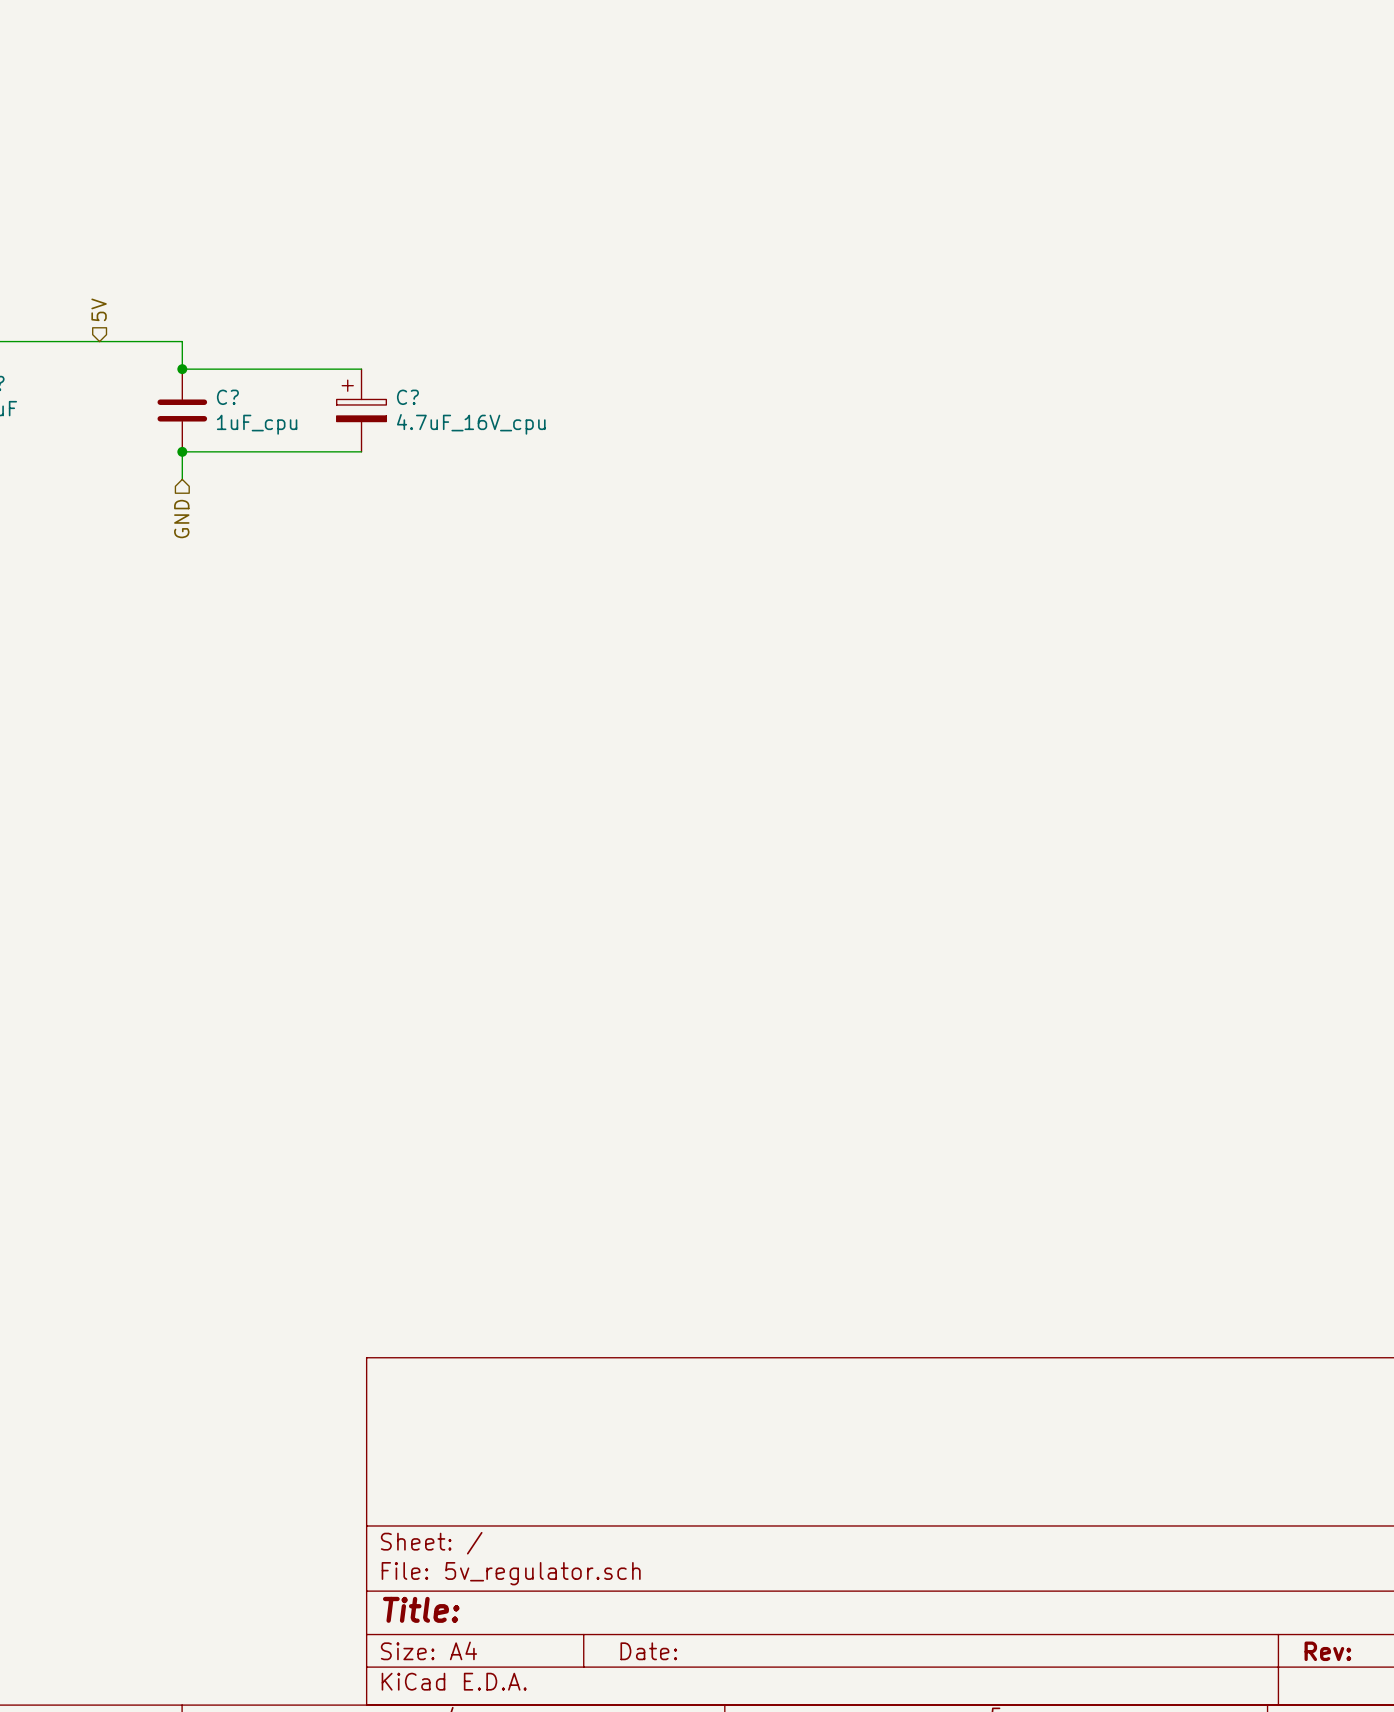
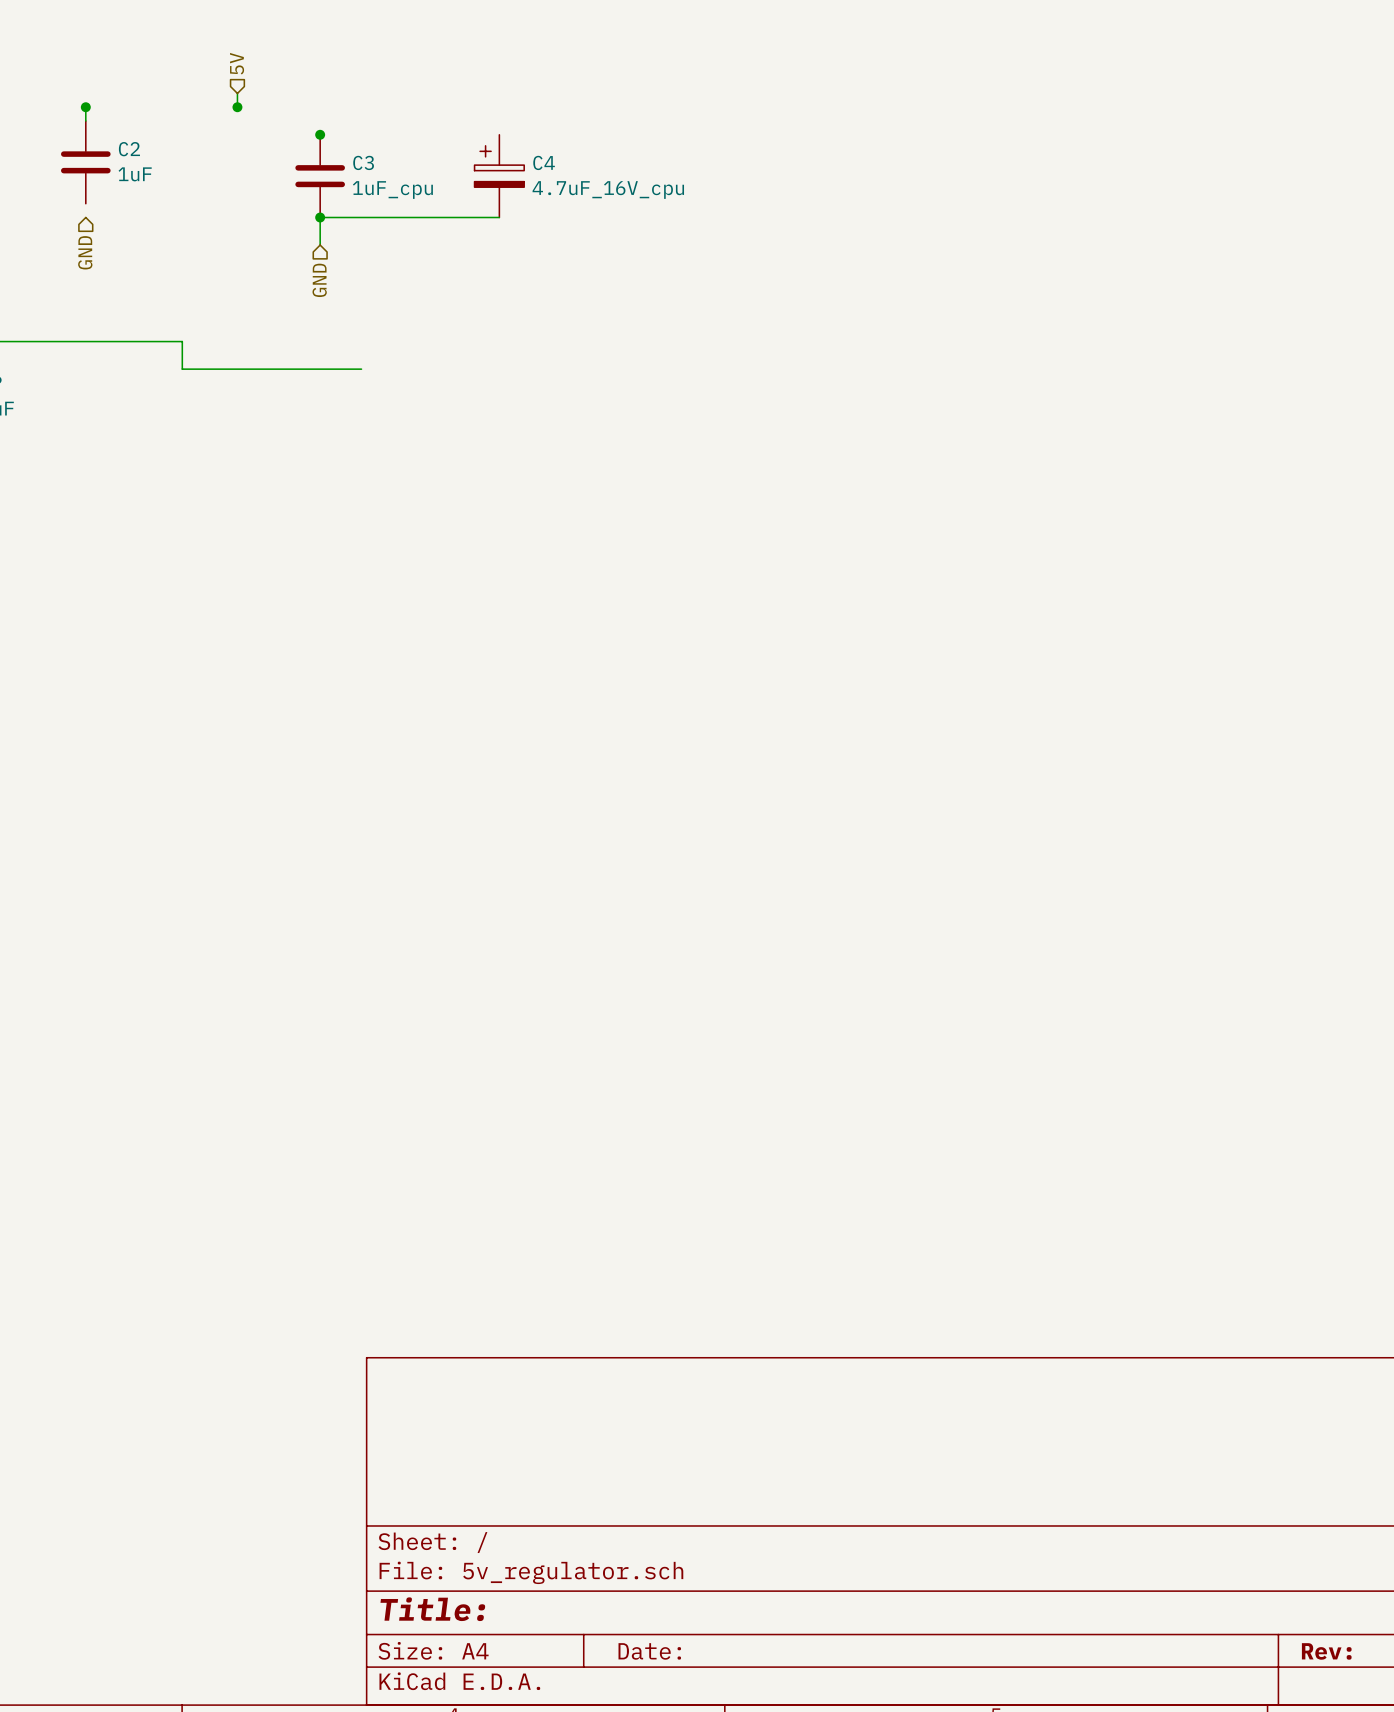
hierarchical label: none -> 5V (237, 63)
wire: none -> (237, 93) (237, 107)
wire: none -> (85, 107) (85, 121)
junction: none -> (85, 107)
junction: none -> (237, 107)
junction: none -> (320, 134)
C2: none -> 1uF (85, 162)
C3: none -> 1uF_cpu (320, 176)
C4: none -> 4.7uF_16V_cpu (499, 176)
junction: none -> (320, 217)
wire: none -> (499, 217) (320, 217) (320, 245)
hierarchical label: none -> GND (85, 252)
hierarchical label: none -> GND (319, 280)
hierarchical label: 5V (99, 309) -> none
junction: (182, 369) -> none
C?: 1uF_cpu (182, 410) -> none
C?: 4.7uF_16V_cpu (361, 410) -> none
junction: (182, 451) -> none
wire: (361, 451) (182, 451) (182, 479) -> none
hierarchical label: GND (181, 519) -> none

